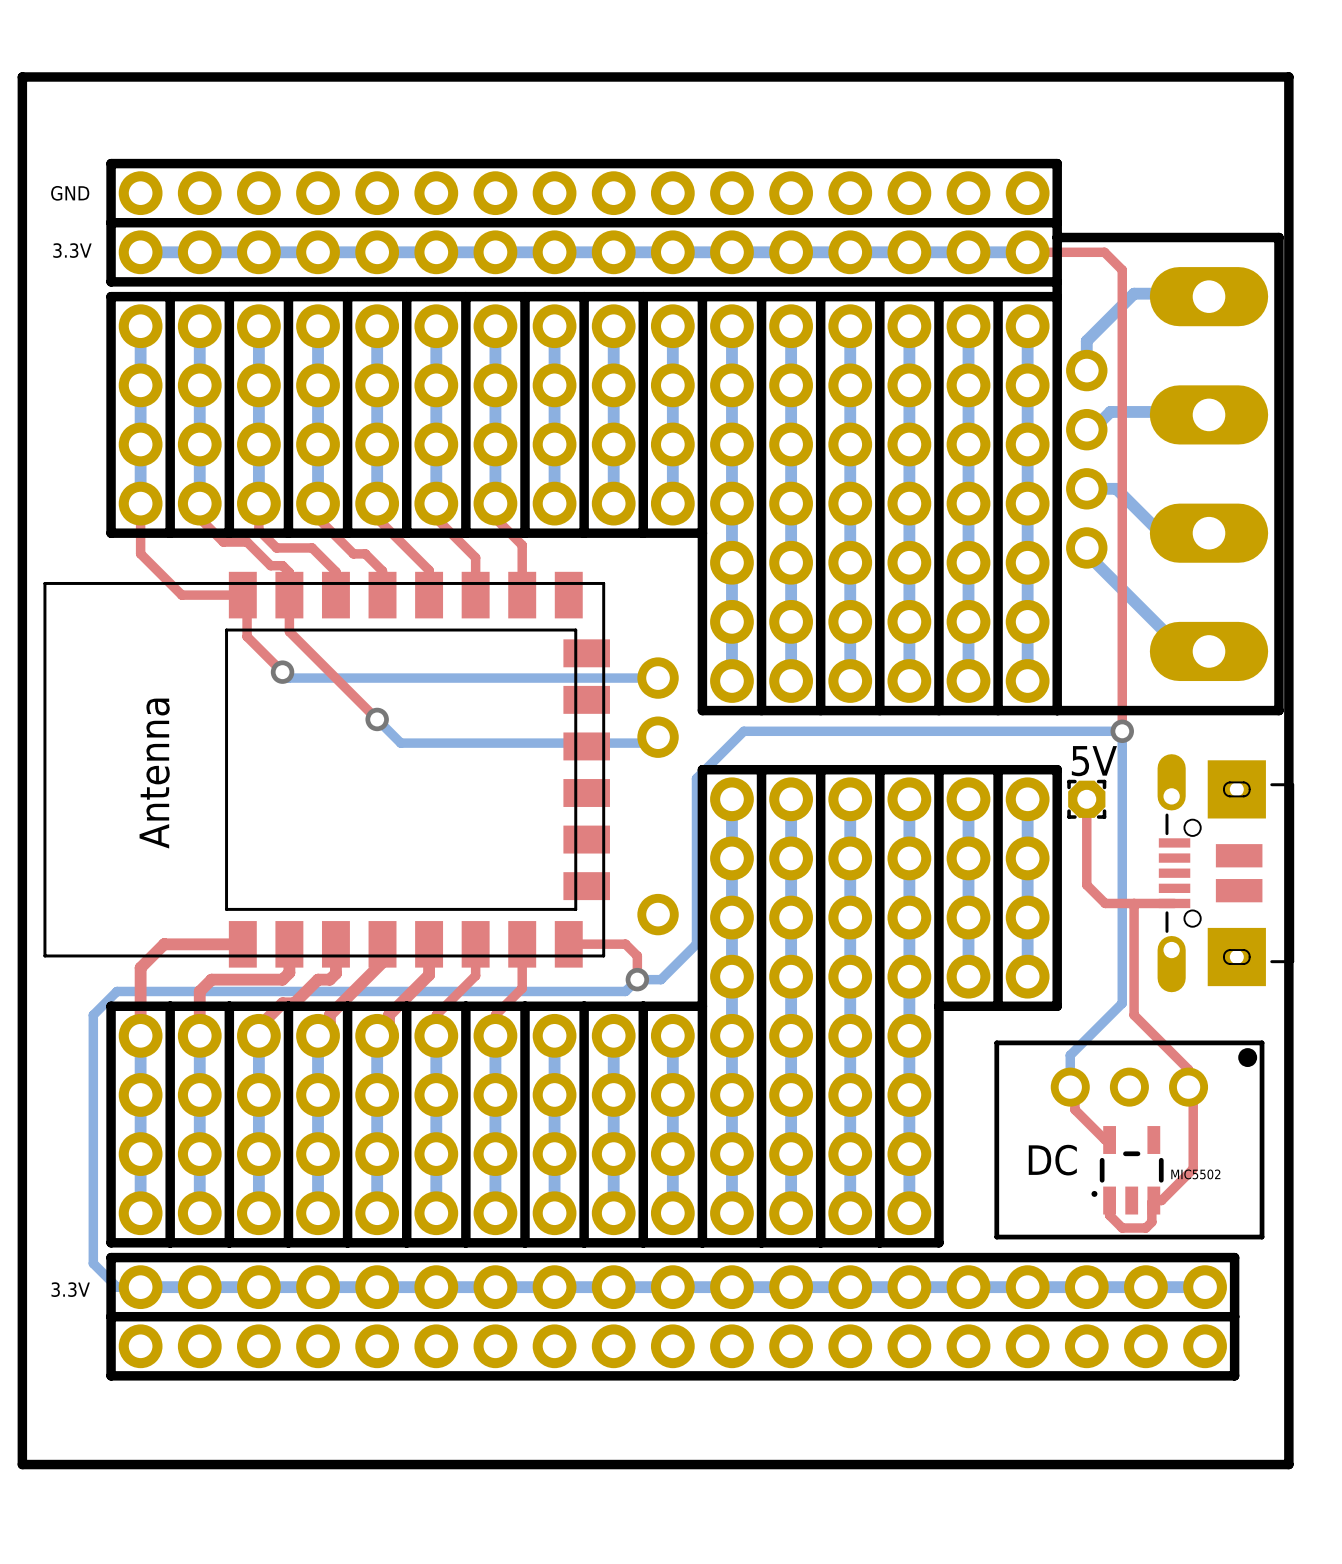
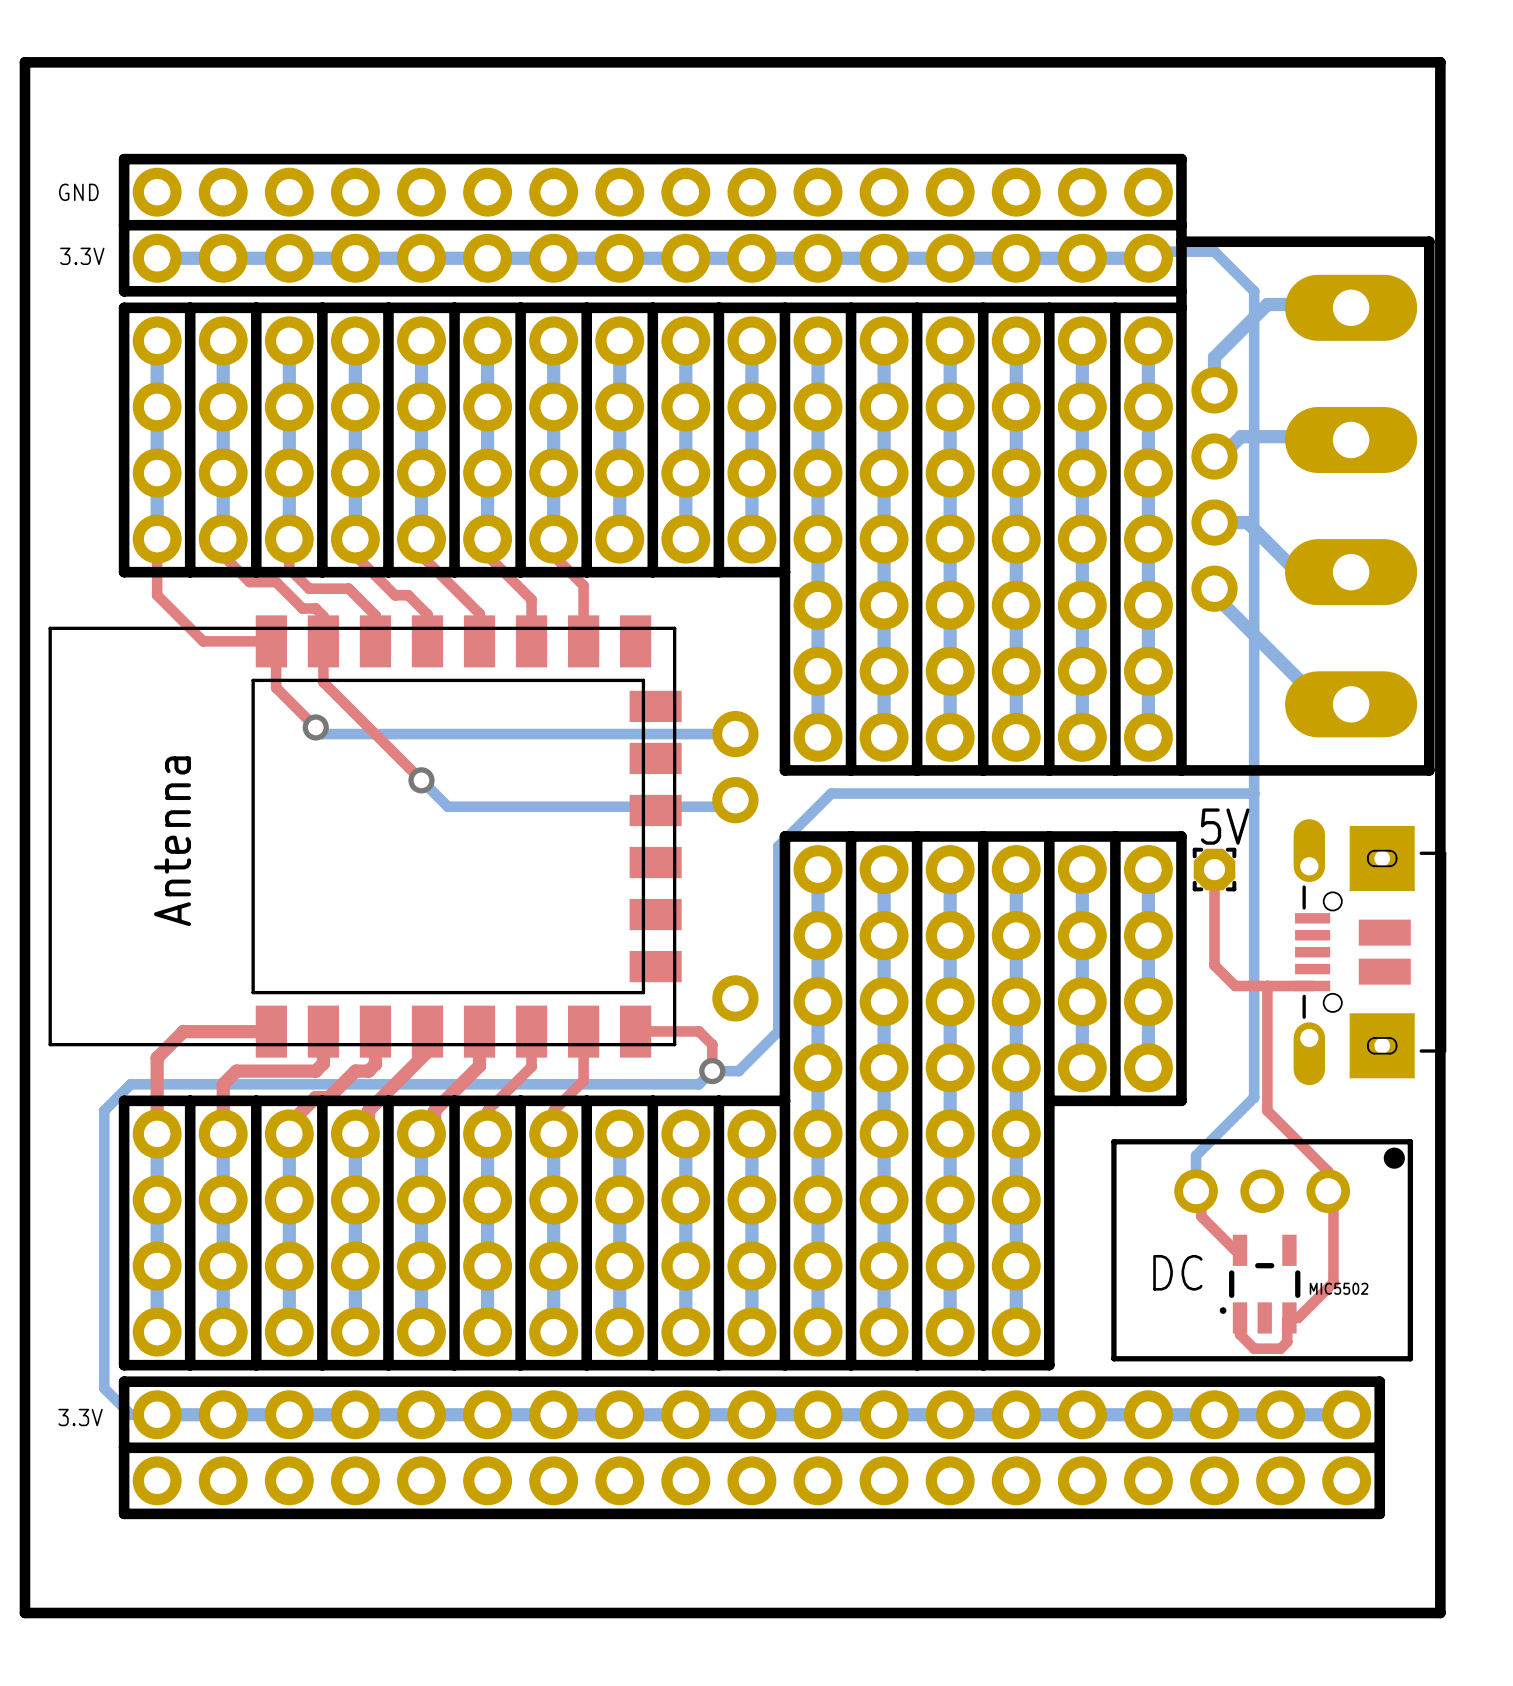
bottom track: none -> (1148, 258) (1155, 251) (1214, 251) (1254, 291) (1254, 793)
top track: (1027, 252) (1104, 252) (1122, 270) (1122, 731) -> none
via: (1122, 731) -> none

